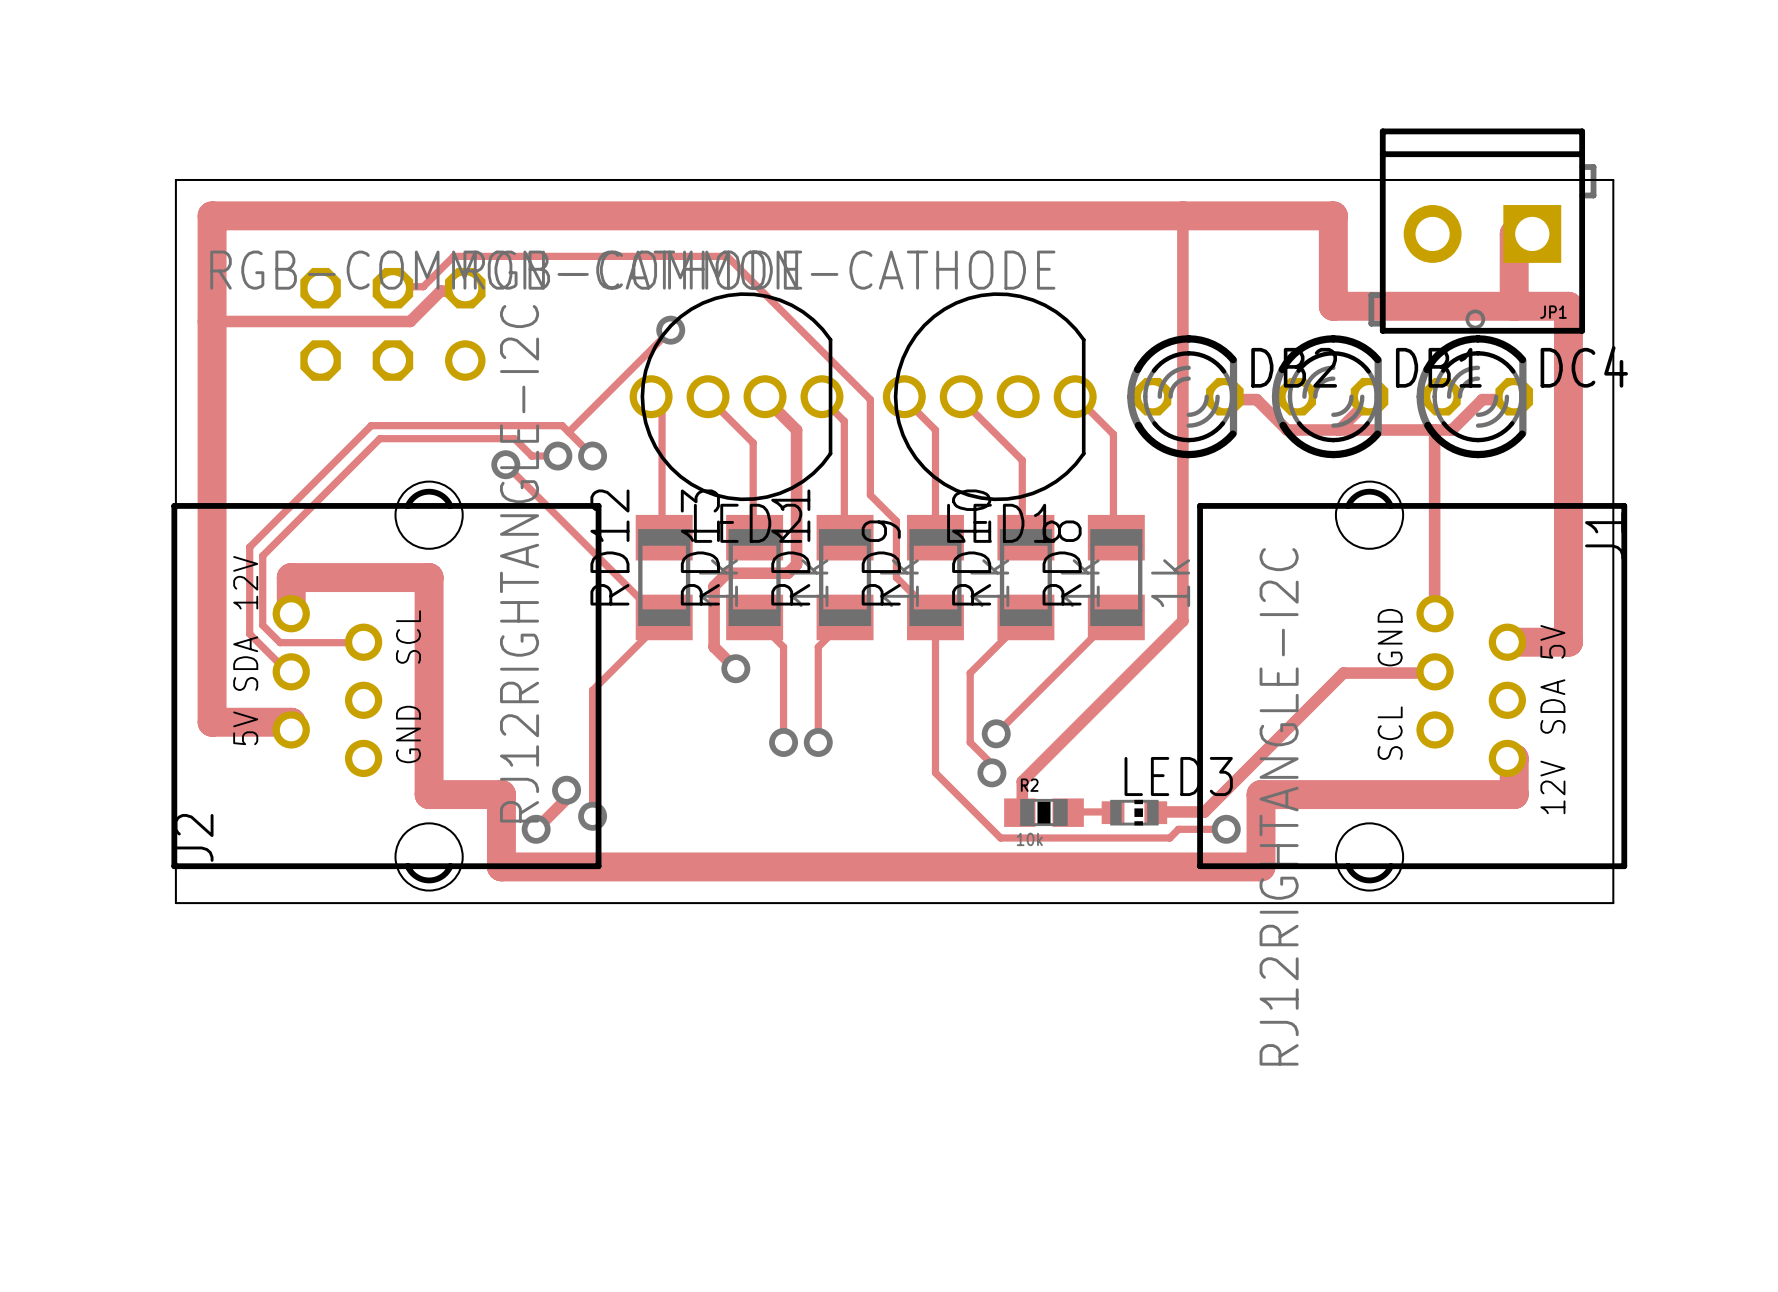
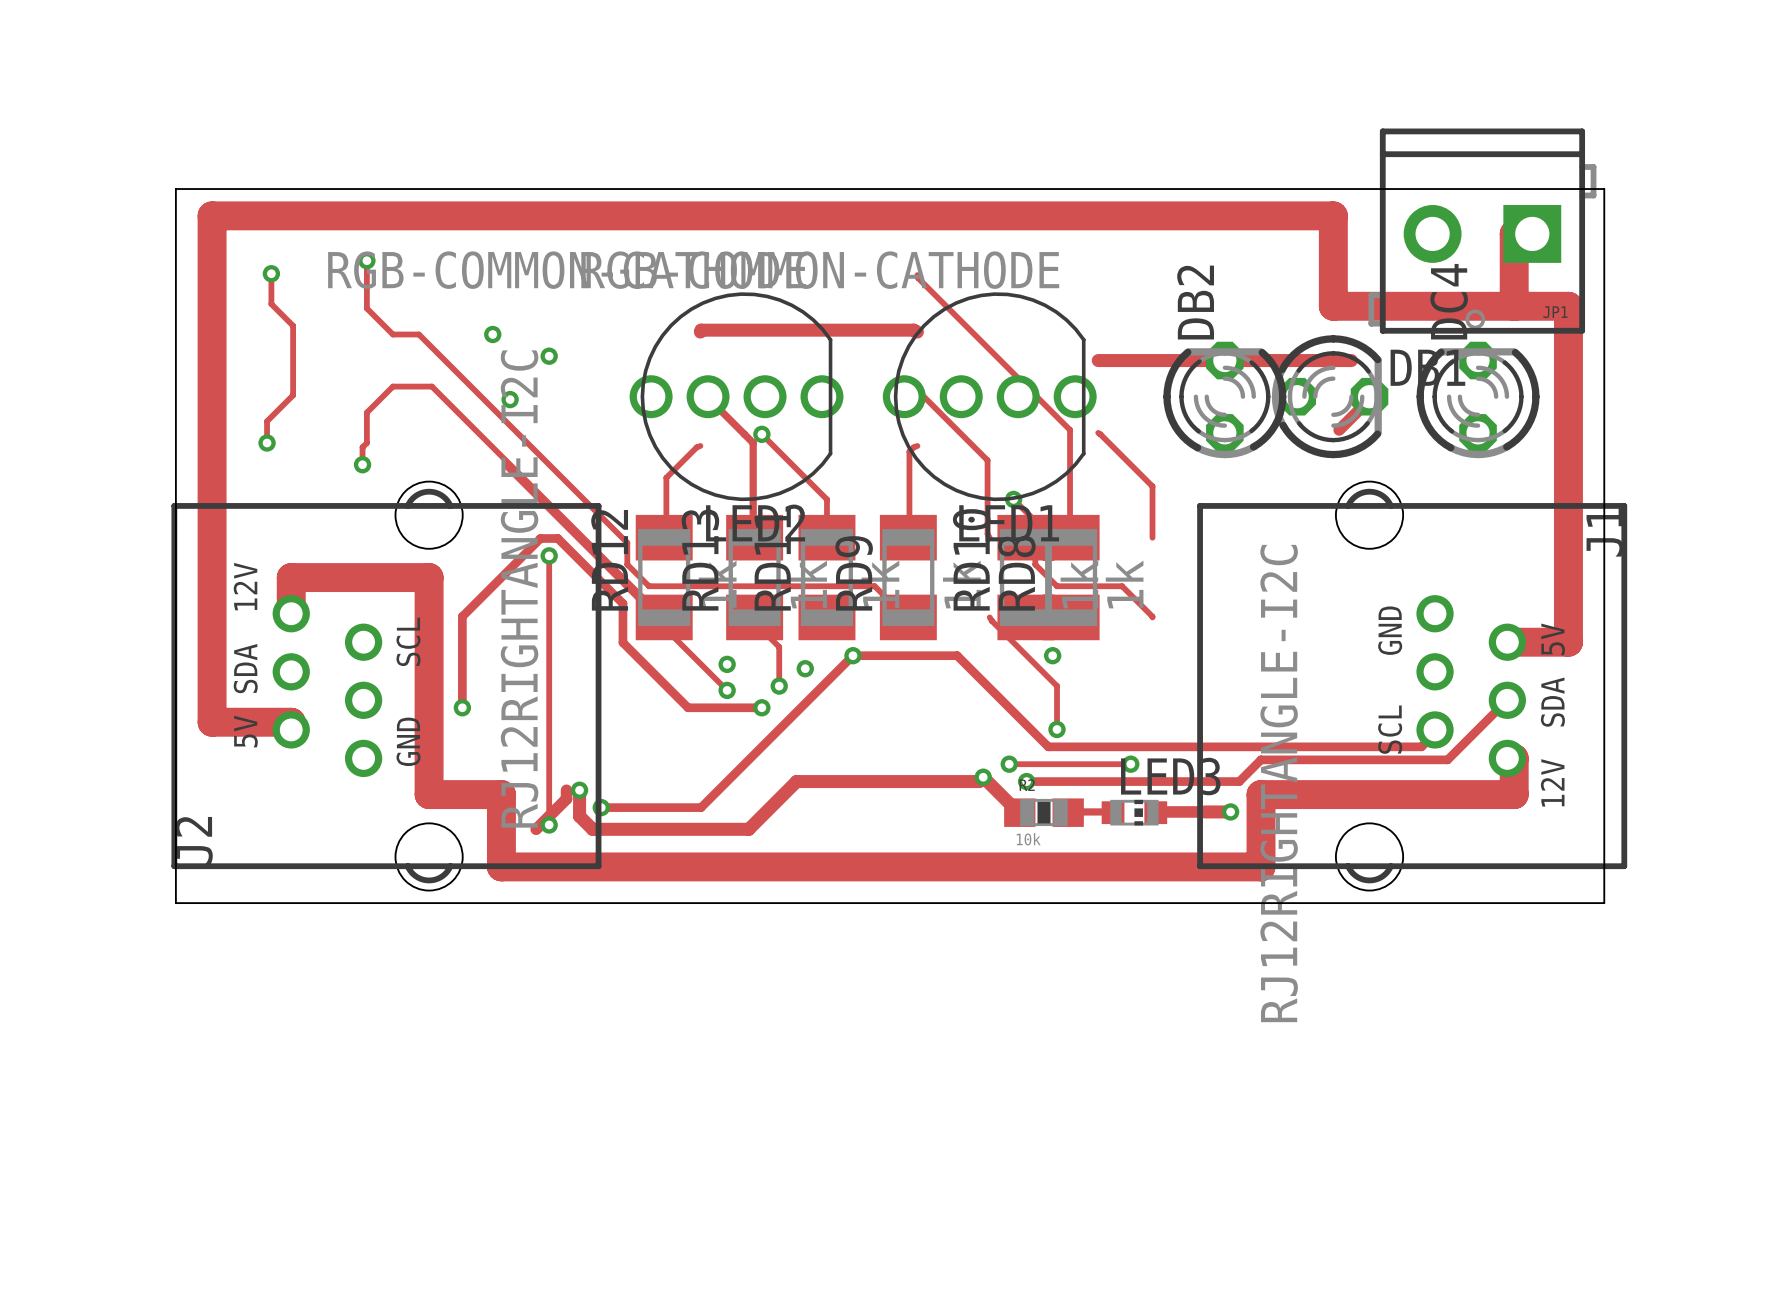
board edge: (175, 189) (175, 179) (1613, 179) (1613, 903) (1604, 903) -> (175, 189) (1604, 189) (1604, 903)
track: (1182, 215) (1182, 620) (1022, 781) (1022, 811) (1019, 812) -> (579, 790) (579, 816) (592, 829) (748, 829) (796, 781) (978, 781) (983, 777) (1019, 812)
track: none -> (366, 260) (366, 308) (392, 334) (418, 334) (627, 542) (627, 564) (649, 586) (874, 586) (905, 616) (908, 617)
via: none -> (366, 260)
track: none -> (271, 273) (271, 304) (293, 325) (293, 395) (267, 421) (267, 443)
via: none -> (271, 273)
track: none -> (917, 275) (918, 278) (1070, 429) (1071, 537)
track: (392, 288) (423, 286) (453, 256) (727, 256) (870, 399) (870, 495) (896, 521) (896, 577) (935, 616) (935, 772) (1000, 837) (1169, 837) (1178, 829) (1226, 829) -> none
track: (465, 288) (462, 291) (440, 291) (410, 321) (212, 321) -> none
part: (392, 324) -> none
track: (670, 330) (568, 432) -> none
via: (670, 330) -> none
track: none -> (700, 332) (701, 330) (913, 330) (917, 332)
via: none -> (492, 334)
via: none -> (549, 356)
track: none -> (1098, 360) (1351, 360)
track: none -> (917, 389) (987, 460) (987, 534) (989, 537)
track: (651, 396) (662, 408) (662, 534) (664, 537) -> (700, 445) (666, 477) (666, 534) (664, 537)
track: (765, 396) (796, 429) (796, 564) (787, 573) (727, 573) (714, 586) (714, 647) (735, 668) -> none
track: (821, 396) (844, 421) (845, 537) -> none
track: (904, 396) (935, 429) (935, 537) -> none
track: (961, 396) (961, 399) (1022, 460) (1022, 534) (1025, 537) -> none
track: (1075, 396) (1113, 434) (1113, 534) (1116, 537) -> none
DB2 rotation: 0° (1185, 396) -> 90° counterclockwise (1224, 399)
track: (1224, 396) (1226, 399) (1256, 399) (1287, 429) (1451, 429) (1482, 399) (1512, 399) (1514, 396) -> none
DC4 rotation: 0° (1474, 396) -> 90° counterclockwise (1478, 399)
via: none -> (510, 399)
track: (1434, 429) (1435, 613) -> none
track: none -> (1098, 432) (1152, 486) (1152, 537)
track: none -> (761, 434) (826, 499) (826, 537)
via: none -> (761, 434)
via: none -> (267, 443)
track: none -> (917, 445) (909, 451) (908, 537)
track: (557, 456) (531, 456) (514, 438) (379, 438) (262, 555) (262, 625) (280, 642) (363, 642) -> none
via: (557, 456) -> none
track: (592, 456) (562, 425) (371, 425) (249, 547) (249, 633) (288, 673) (291, 671) -> none
via: (592, 456) -> none
track: none -> (362, 464) (362, 447) (366, 443) (366, 412) (392, 386) (431, 386) (664, 617) (666, 620) (666, 629) (727, 690)
via: none -> (362, 464)
via: (505, 464) -> none
track: none -> (1013, 499) (1035, 521) (1035, 564) (1057, 586) (1122, 586) (1152, 617)
via: none -> (1013, 499)
track: none -> (549, 555) (549, 824)
via: none -> (549, 555)
RD11 position: (845, 577) -> (826, 577)
RD9 position: (935, 577) -> (908, 577)
RD8 position: (1116, 577) -> (1071, 577)
track: none -> (745, 617) (748, 616) (779, 647) (779, 686)
track: (754, 617) (783, 647) (783, 742) -> none
track: (845, 617) (844, 620) (818, 647) (818, 742) -> none
track: none -> (989, 617) (1057, 686) (1057, 729)
track: (1025, 617) (970, 673) (970, 742) (991, 764) (991, 772) -> none
track: (1116, 617) (1113, 616) (996, 733) -> none
track: (662, 620) (592, 690) (592, 816) -> none
via size: [721, 654, 751, 684] -> [718, 655, 736, 674]
via: none -> (853, 655)
via: none -> (1052, 655)
via: none -> (805, 668)
track: (1435, 671) (1343, 673) (1204, 811) -> (1230, 811) (1204, 811)
via: none -> (779, 686)
via: none -> (727, 690)
track: none -> (1507, 700) (1447, 759) (1261, 759) (1239, 781) (1026, 781)
track: none -> (462, 707) (462, 616) (540, 538) (557, 538) (622, 603) (622, 642) (688, 707) (761, 707)
via: none -> (462, 707)
via: none -> (761, 707)
via: none -> (1057, 729)
track: none -> (1435, 729) (1434, 733) (1421, 746) (1048, 746) (957, 655) (853, 655) (701, 807) (601, 807)
via: (996, 733) -> none
via: (783, 742) -> none
via: (818, 742) -> none
track: none -> (1009, 764) (1130, 764)
via: none -> (1009, 764)
via: none -> (1130, 764)
via: (991, 772) -> none
via size: [552, 775, 582, 805] -> [570, 781, 589, 799]
via: none -> (983, 777)
via: none -> (1026, 781)
via size: [578, 801, 608, 831] -> [592, 798, 610, 817]
via size: [521, 814, 551, 844] -> [540, 816, 558, 834]
via size: [1211, 814, 1241, 844] -> [1221, 803, 1240, 821]

